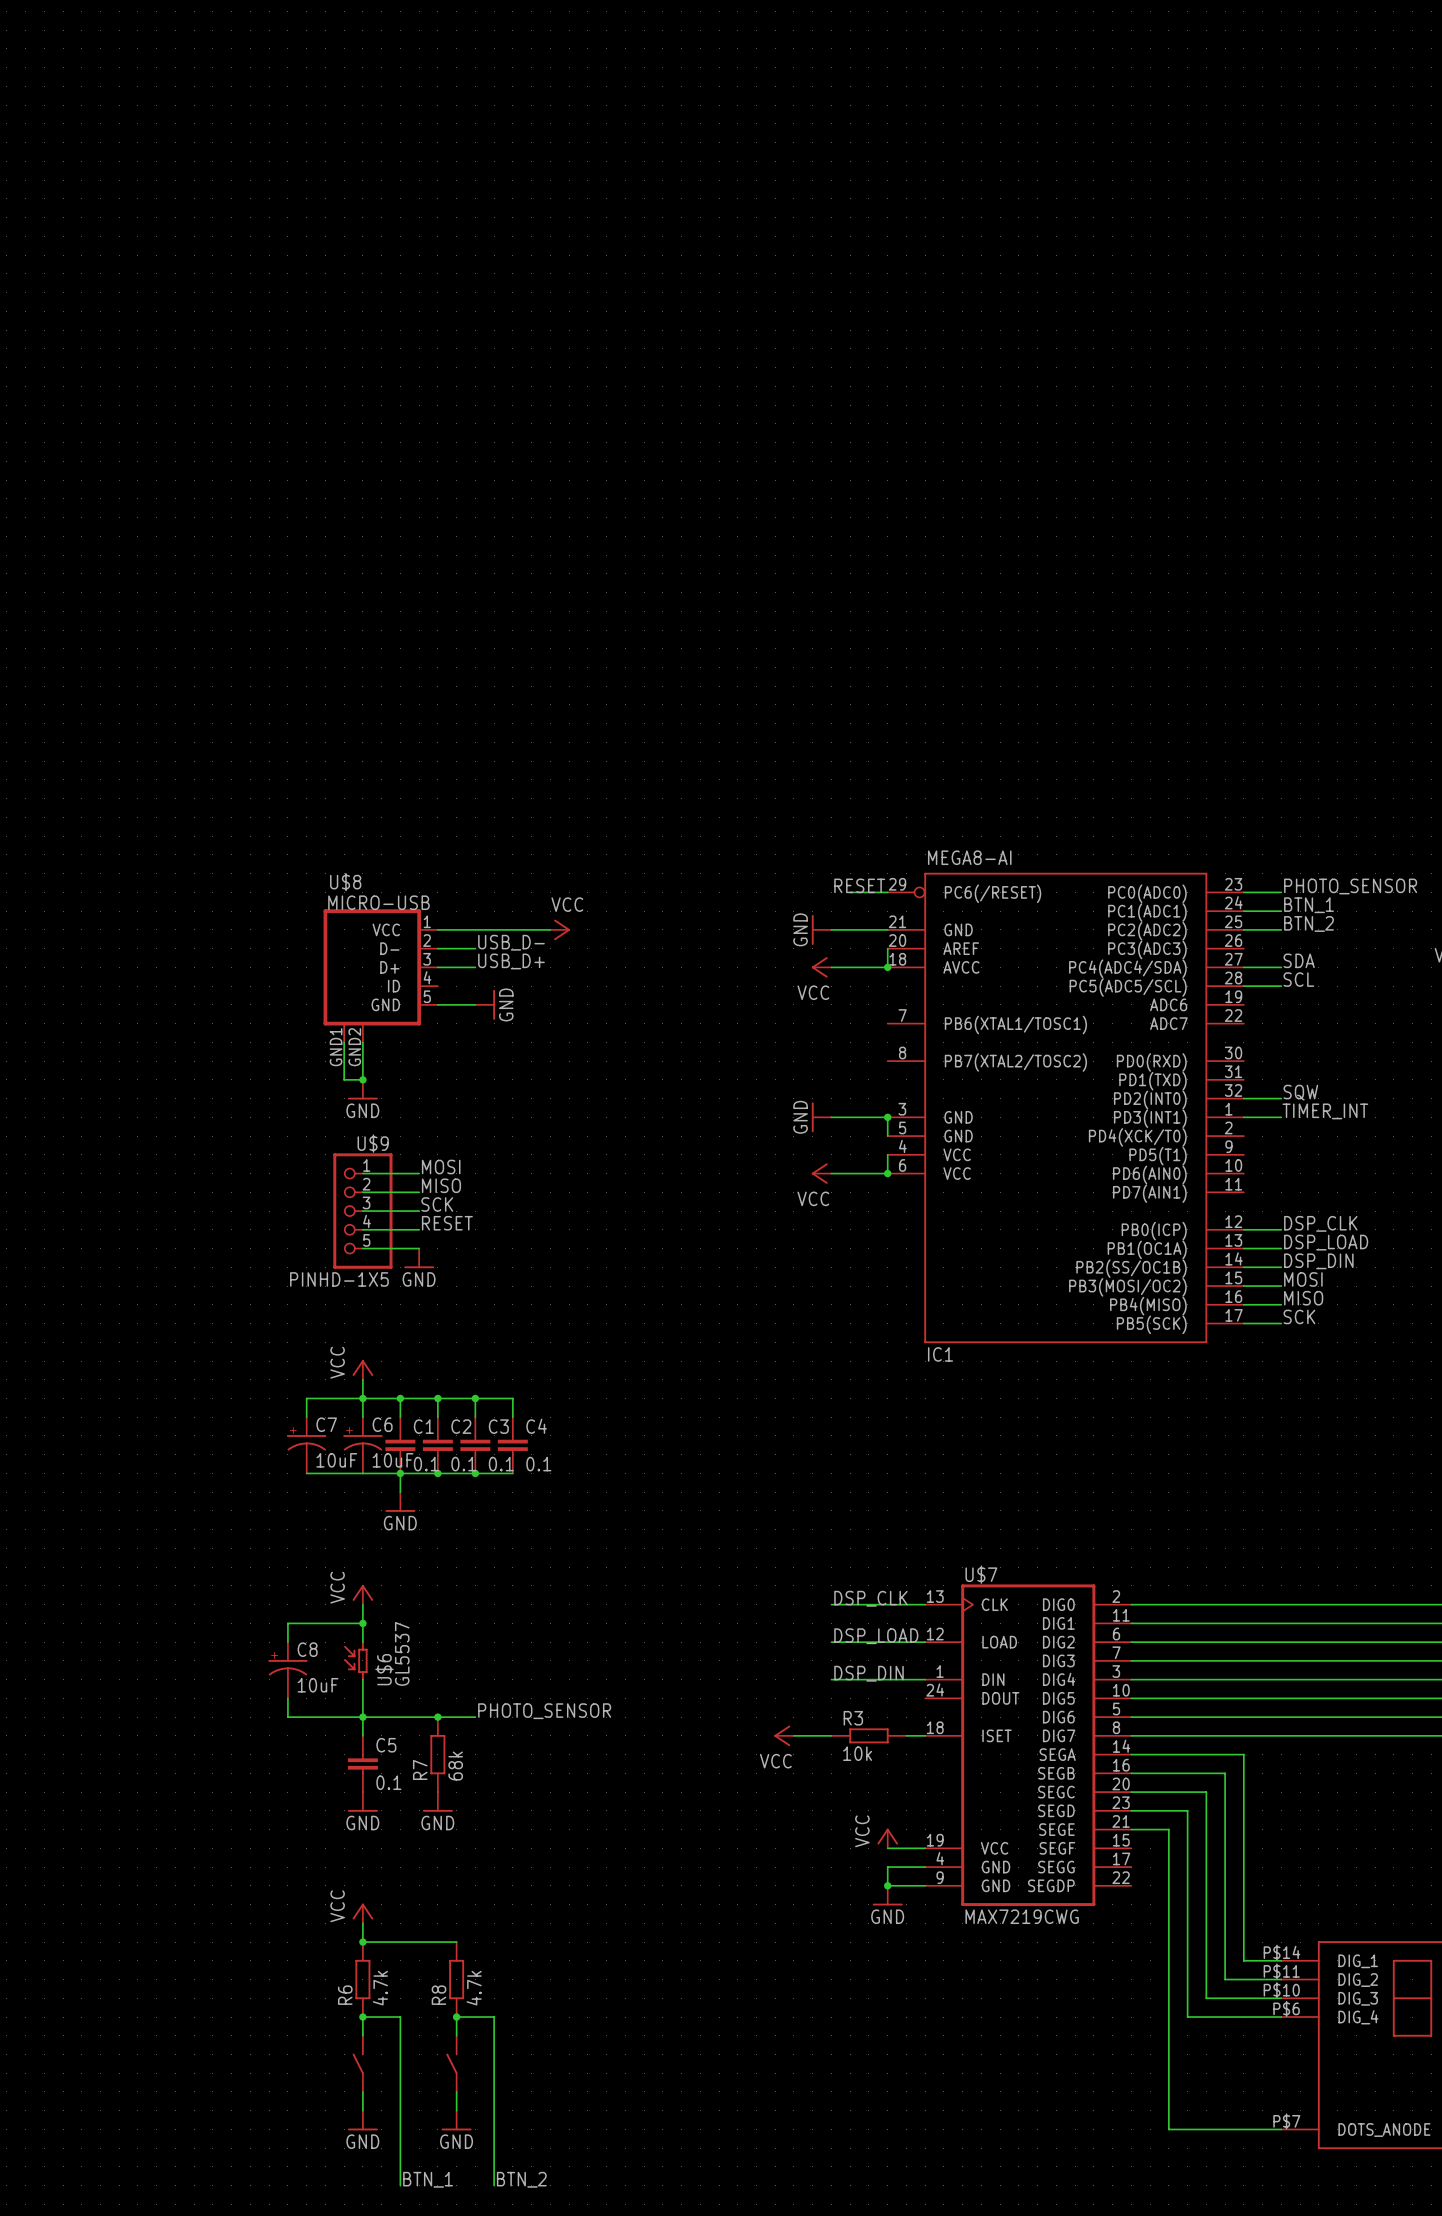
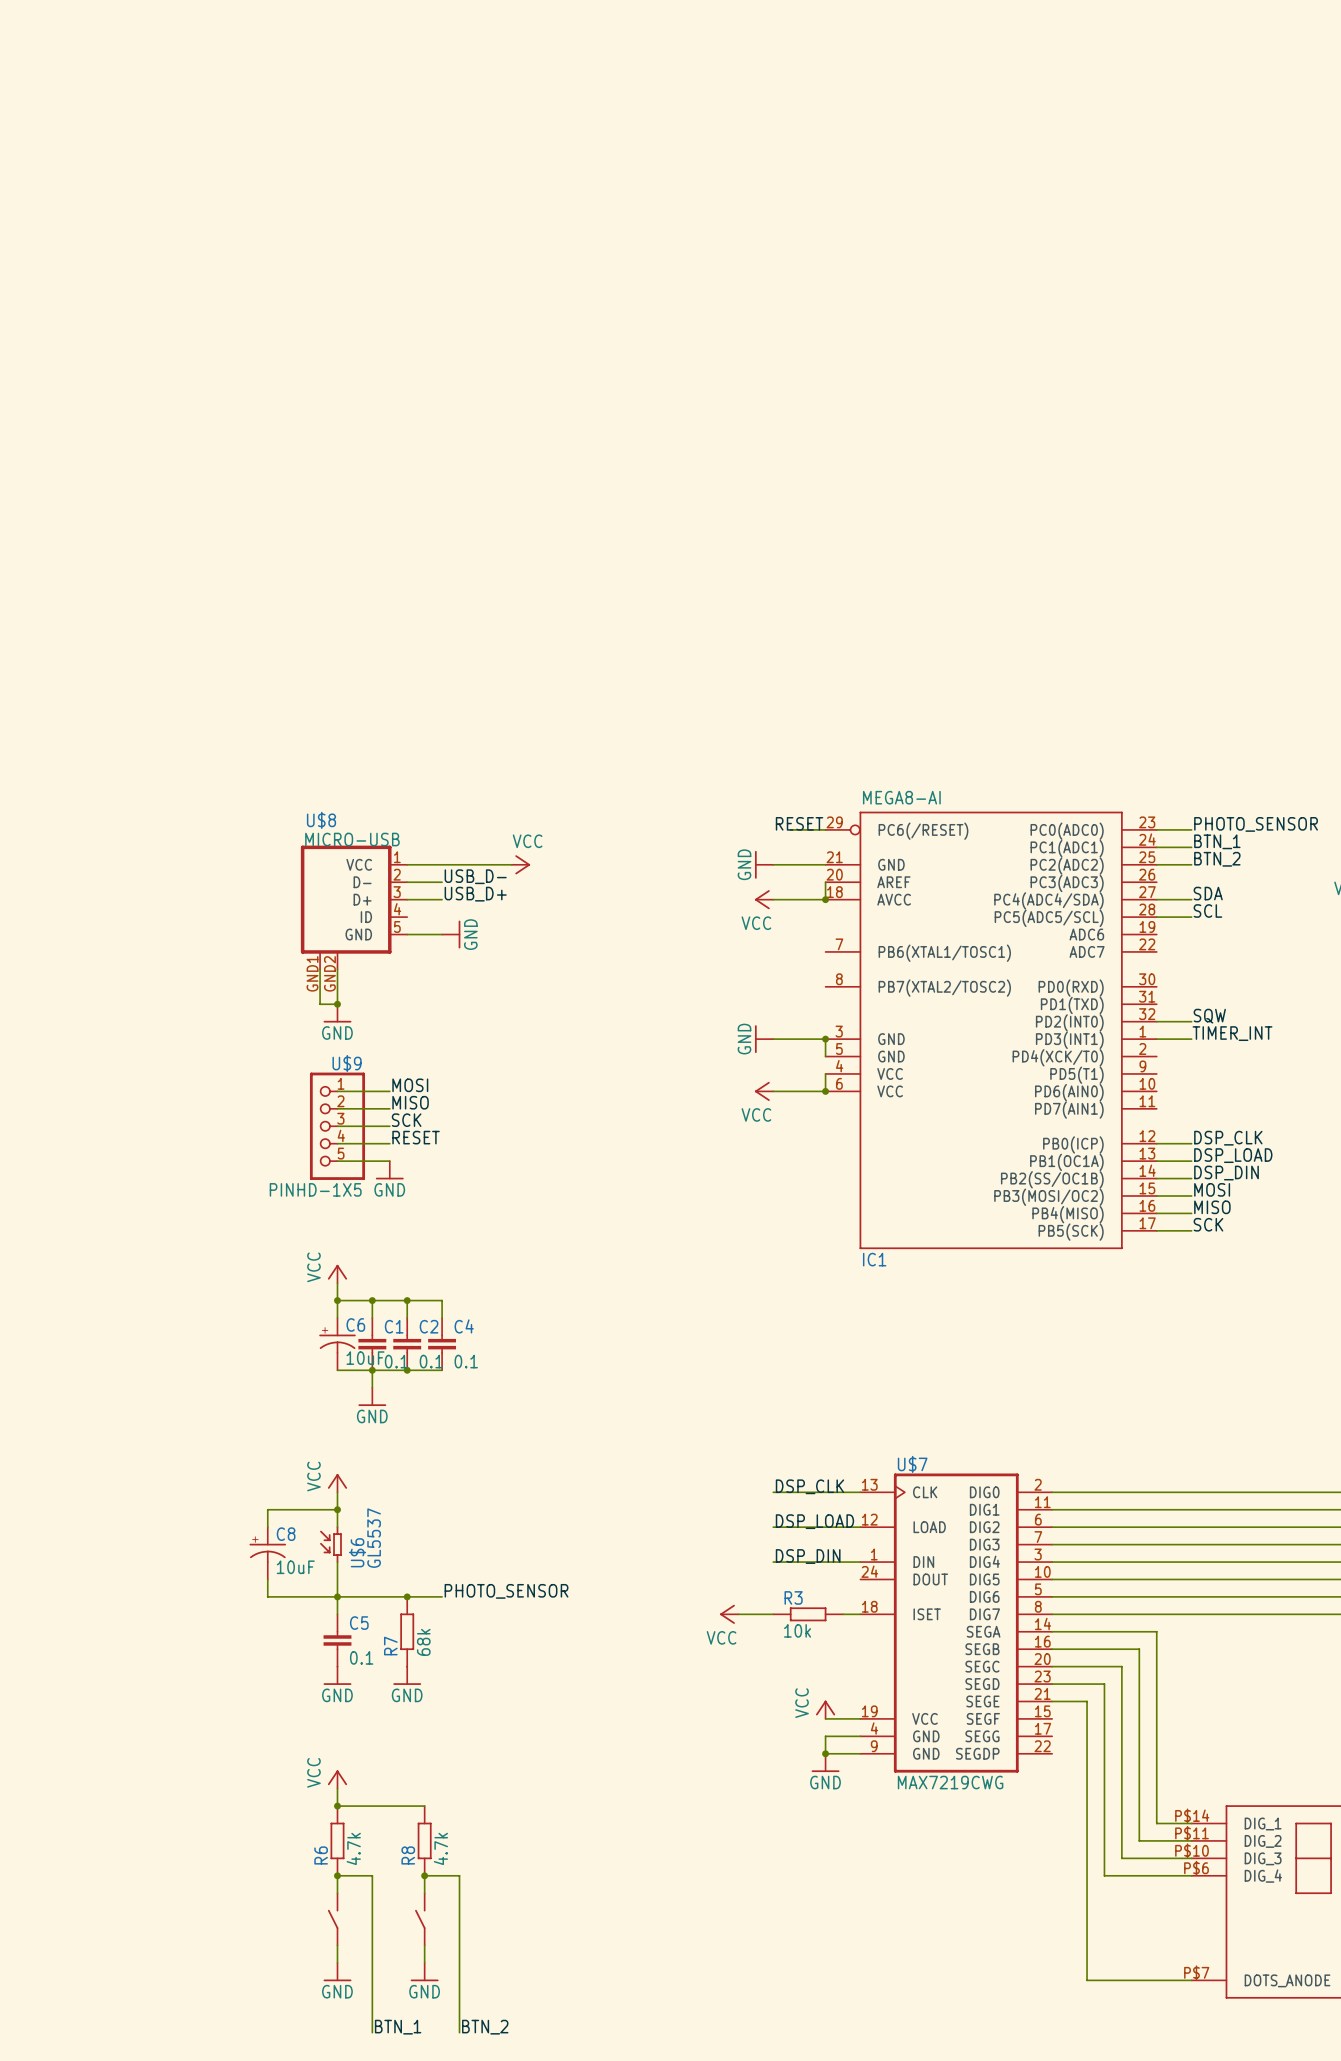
wire: (362, 1398) (306, 1398) (306, 1417) -> none
wire: (475, 1398) (512, 1398) (512, 1417) -> none
junction: (475, 1398) -> none
C3 name: C3 (498, 1426) -> C4 (464, 1326)
C7: 10uF (306, 1445) -> none
C4: 0.1 (512, 1445) -> none
wire: (306, 1473) (362, 1473) -> none
wire: (475, 1473) (512, 1473) -> none
junction: (475, 1473) -> none

